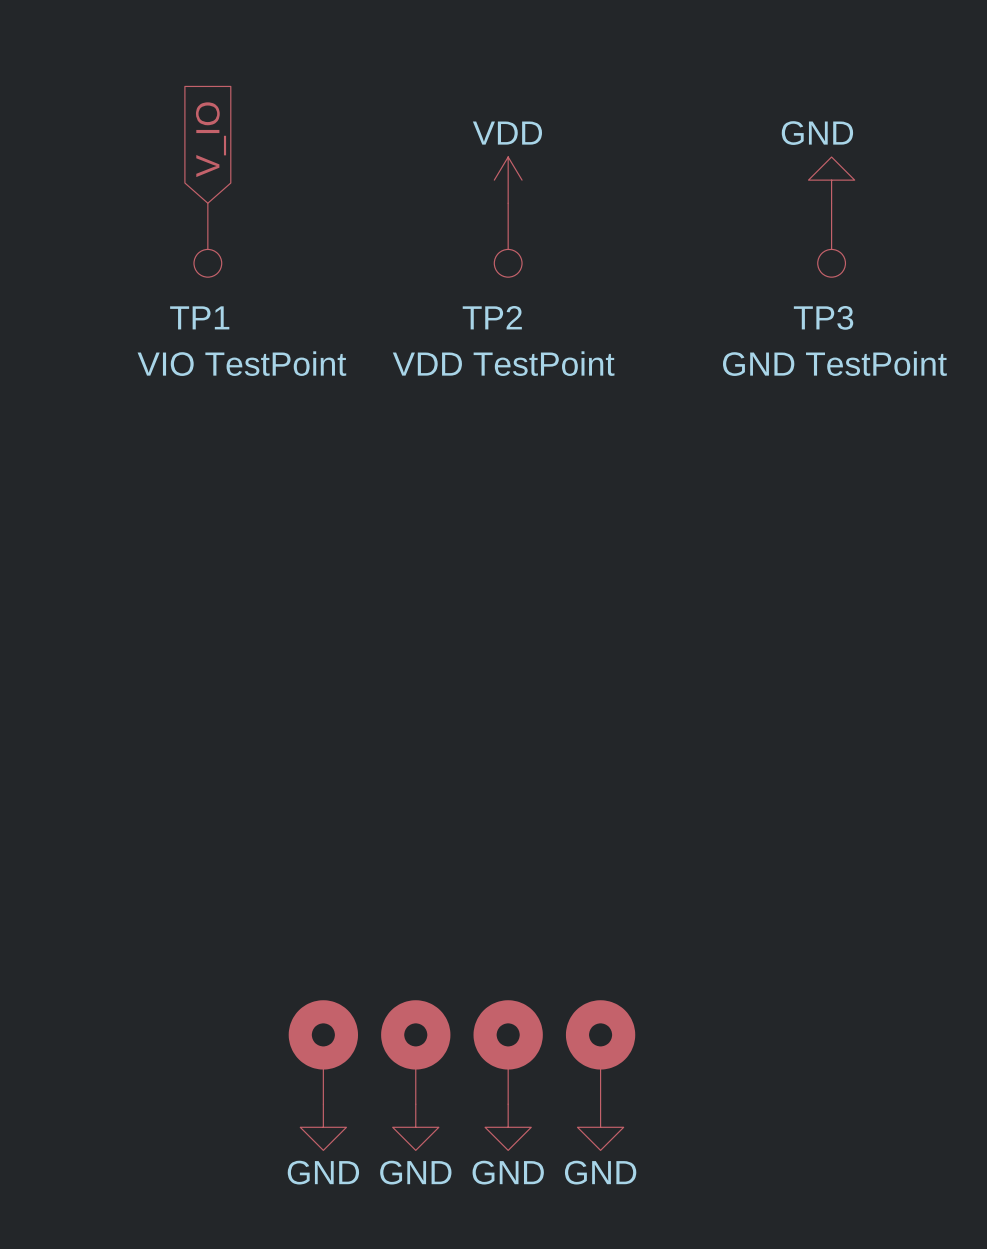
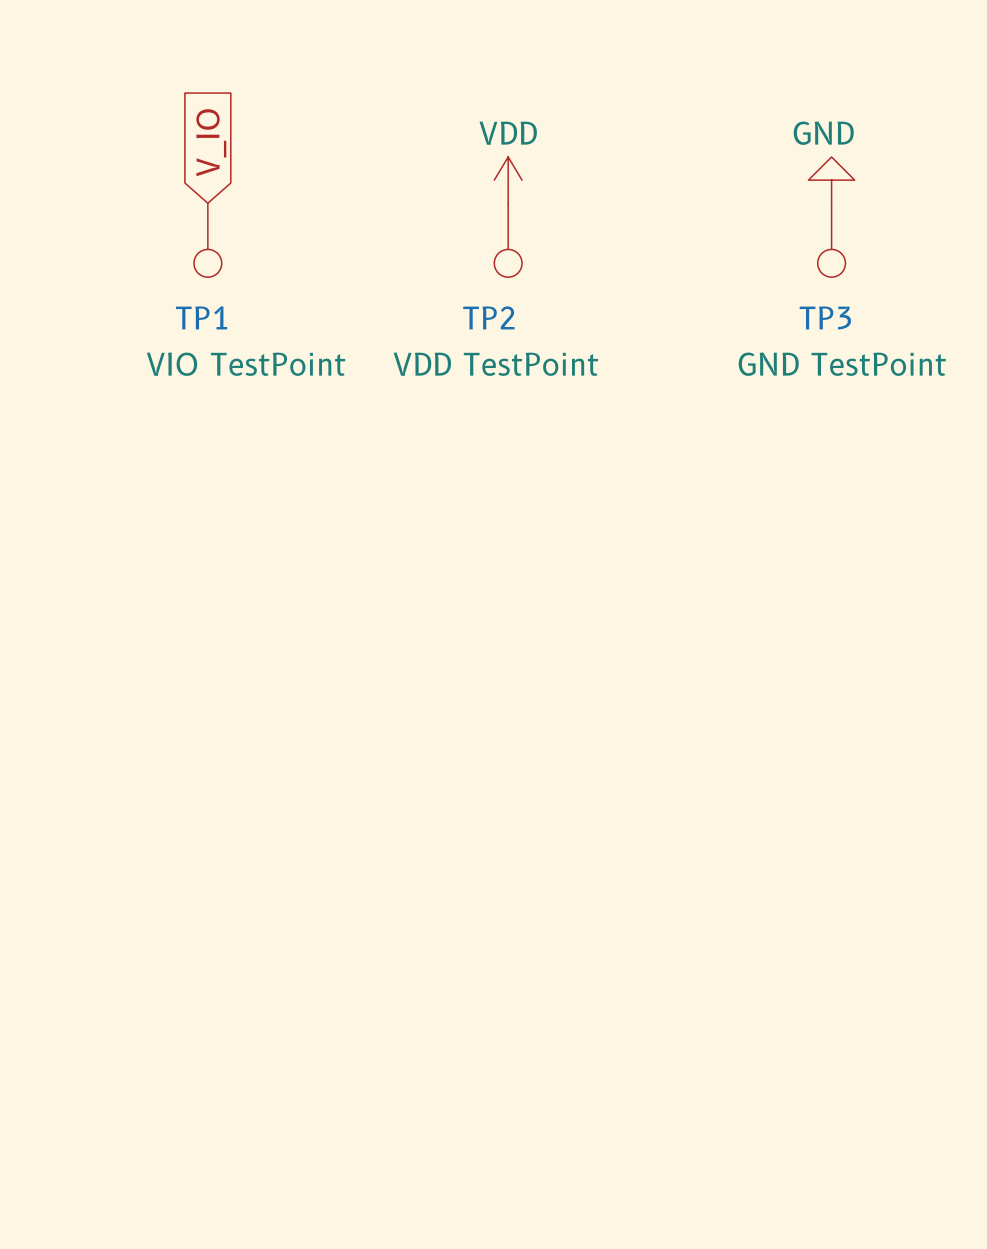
part: (323, 1052) -> none
part: (415, 1052) -> none
part: (508, 1052) -> none
part: (600, 1052) -> none
power symbol: GND (323, 1127) -> none
power symbol: GND (415, 1127) -> none
power symbol: GND (508, 1127) -> none
power symbol: GND (600, 1127) -> none

